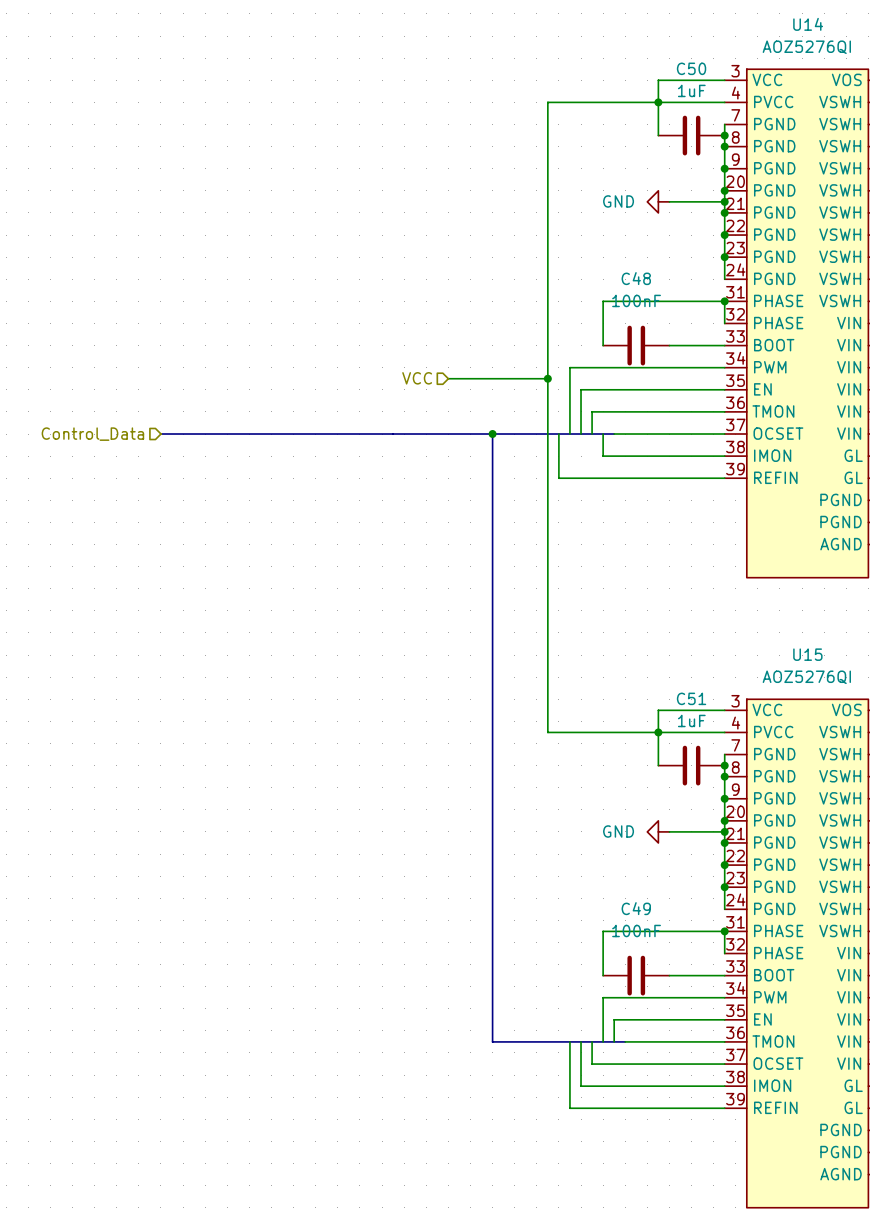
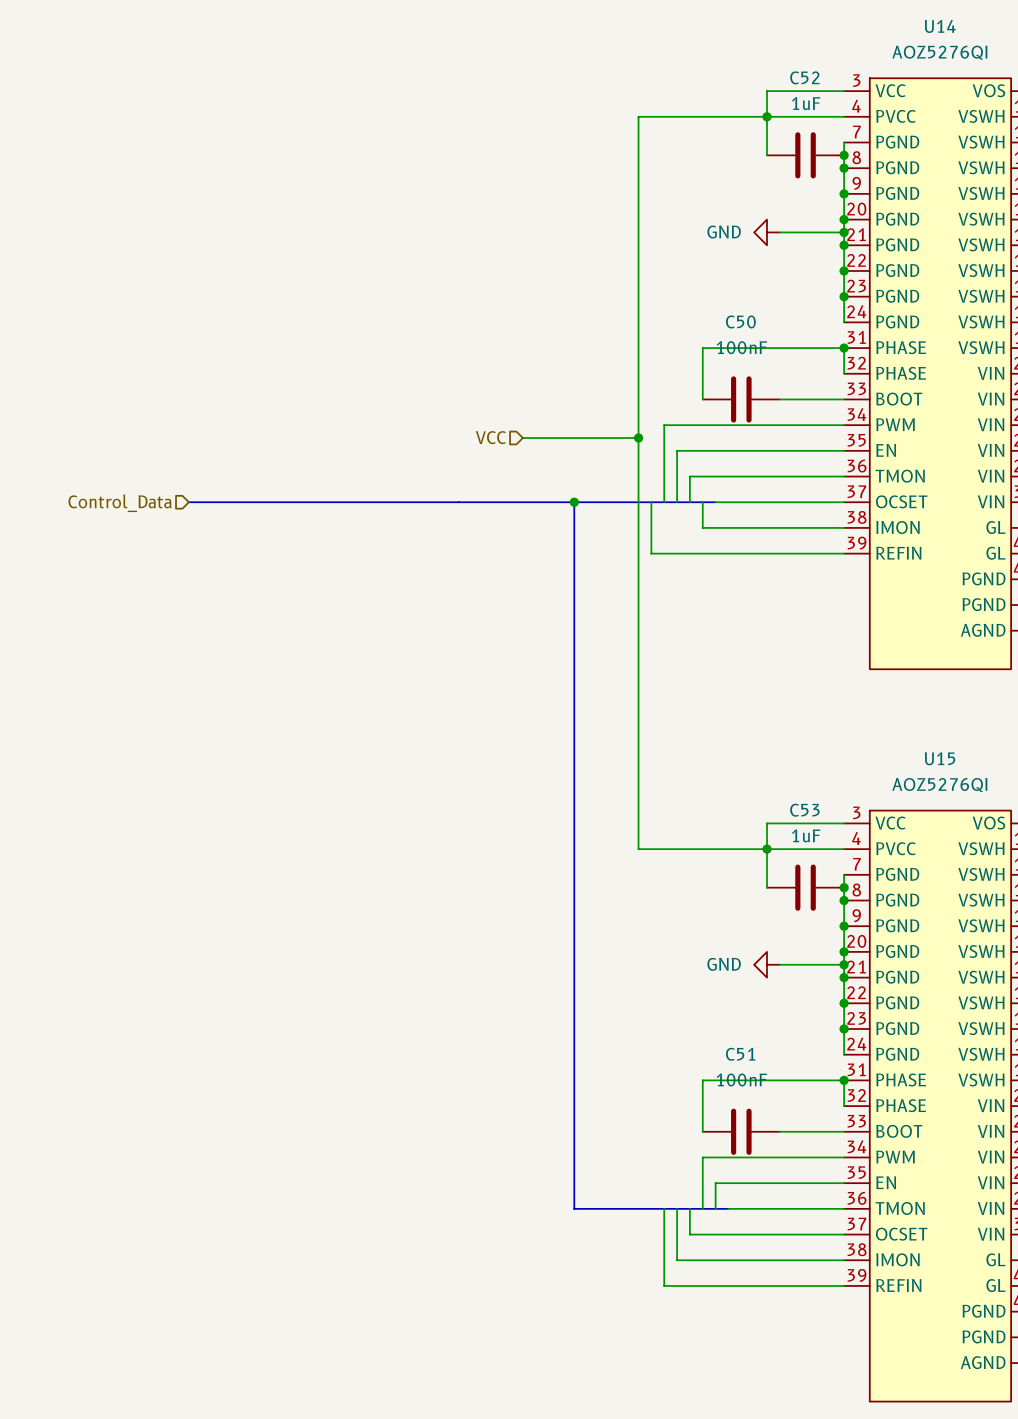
C50 name: C50 (691, 68) -> C52 (804, 77)
C48 name: C48 (636, 278) -> C50 (740, 321)
C51 name: C51 (691, 698) -> C53 (804, 810)
C49 name: C49 (636, 908) -> C51 (740, 1054)

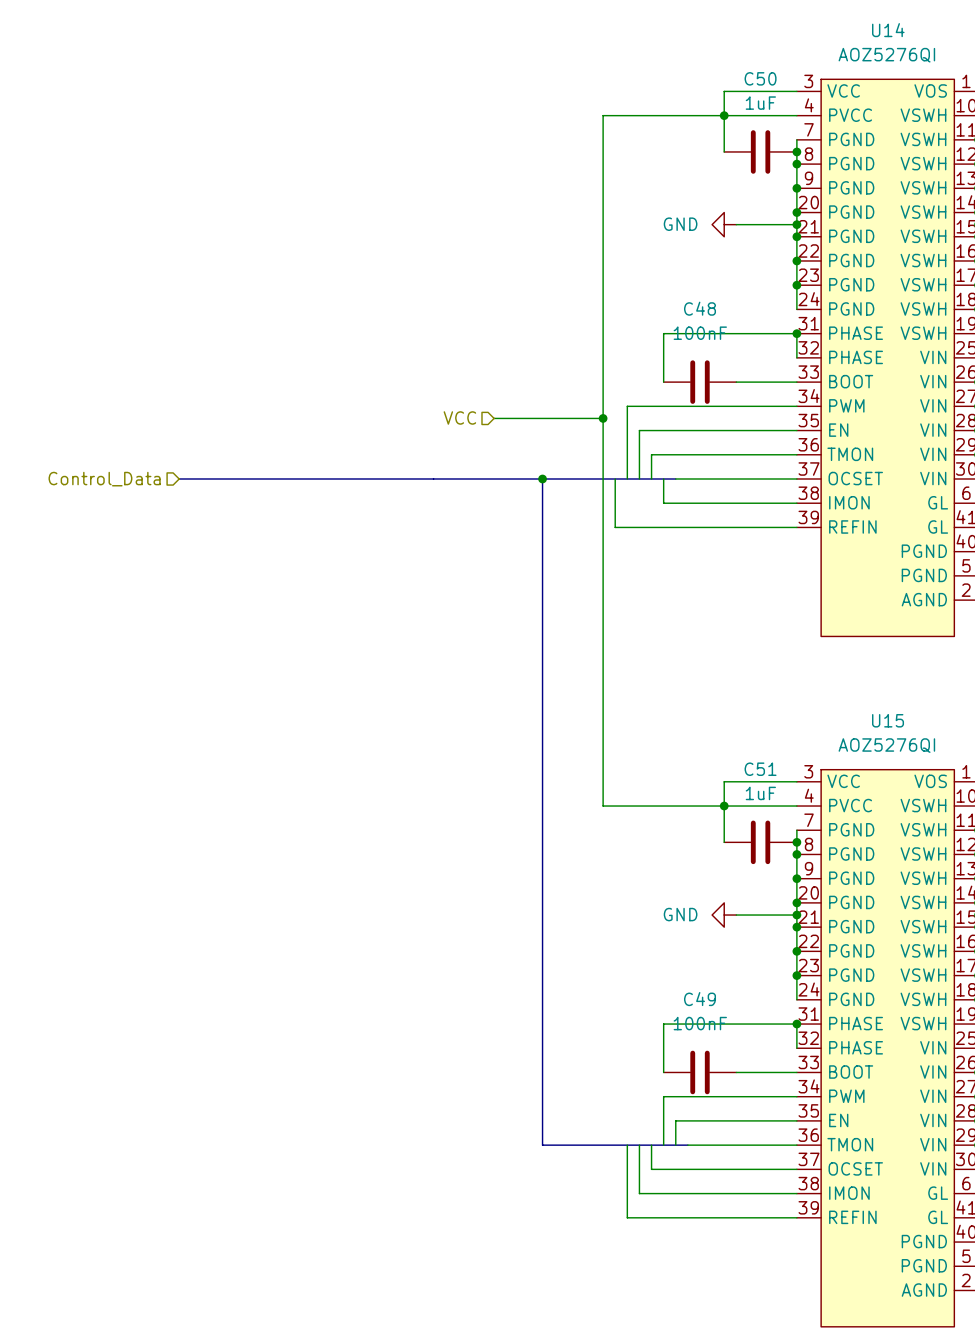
C52 name: C52 (804, 77) -> C50 (760, 78)
C50 name: C50 (740, 321) -> C48 (700, 308)
C53 name: C53 (804, 810) -> C51 (760, 769)
C51 name: C51 (740, 1054) -> C49 (700, 999)

